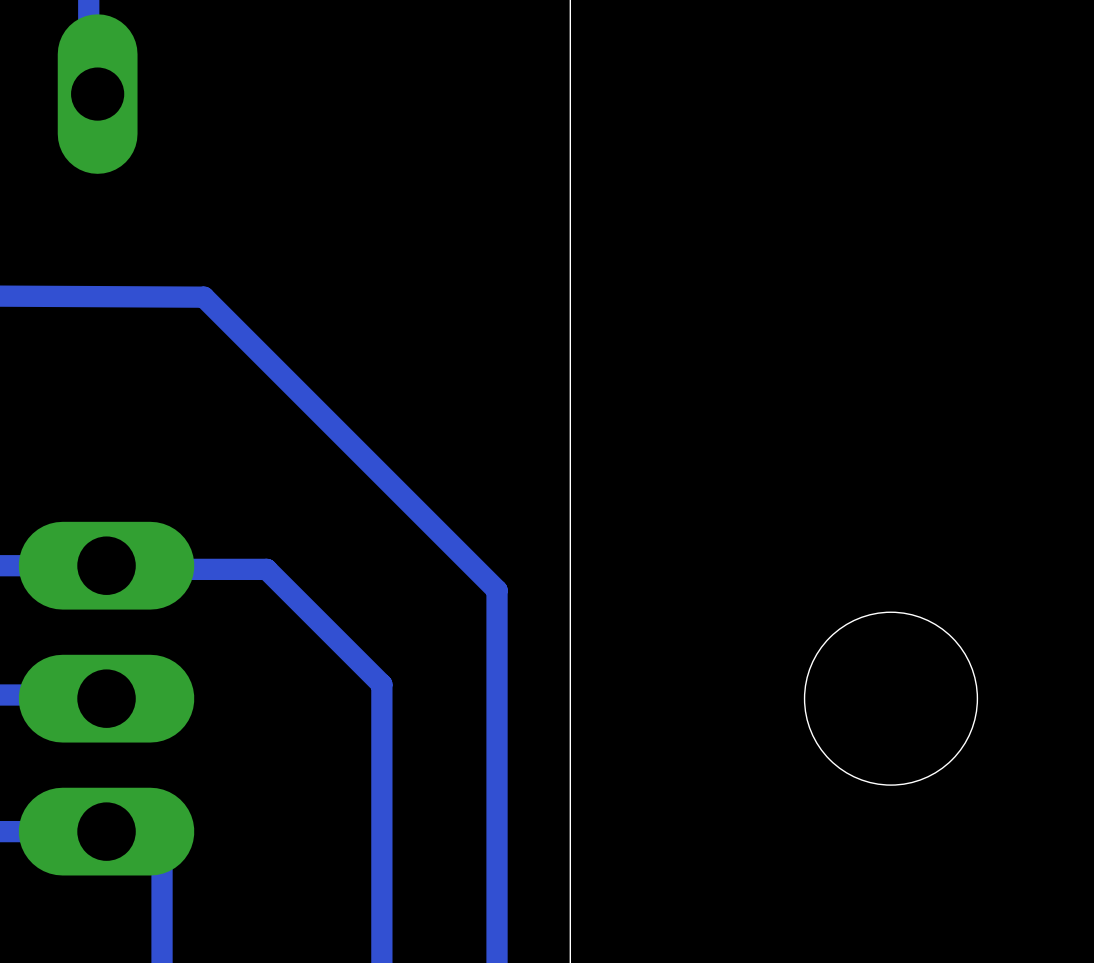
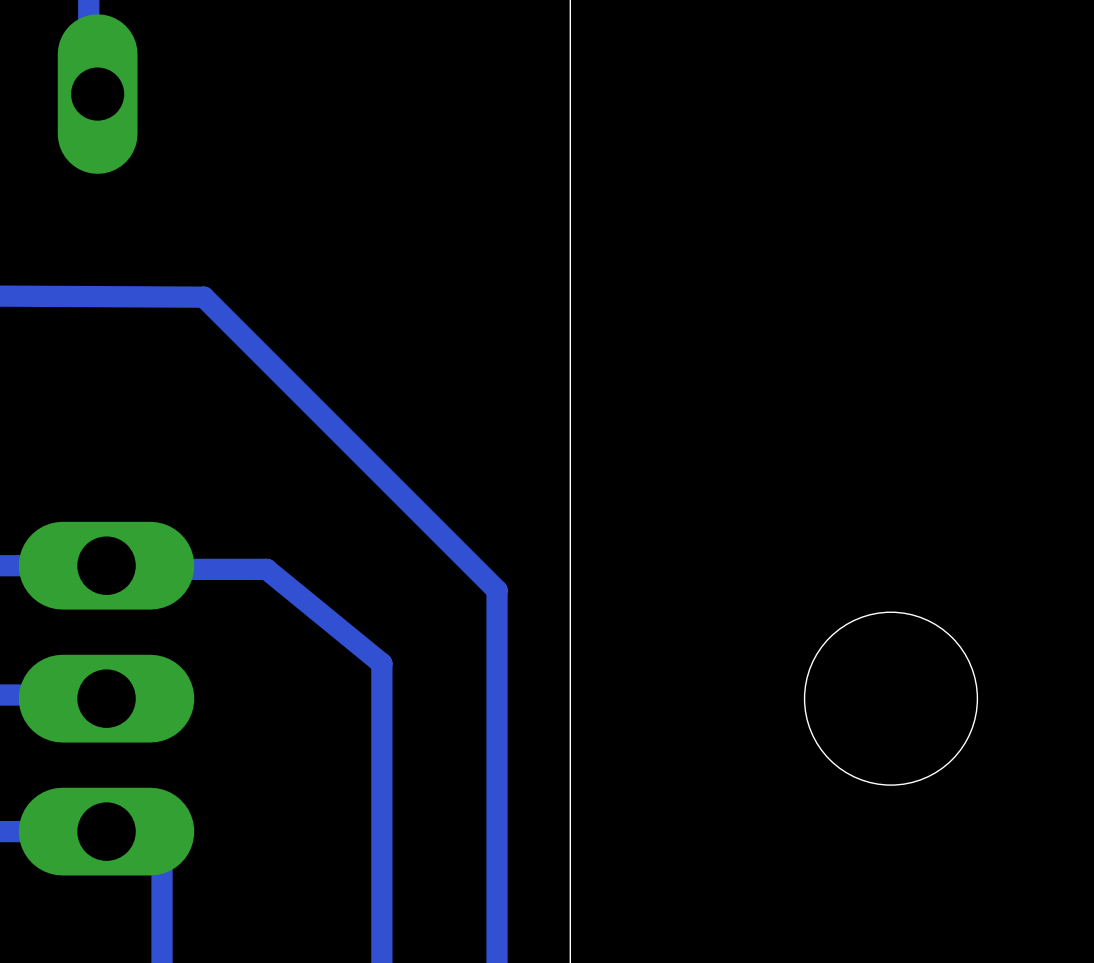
track: (266, 569) (381, 684) -> (266, 569) (381, 663) (381, 684)

